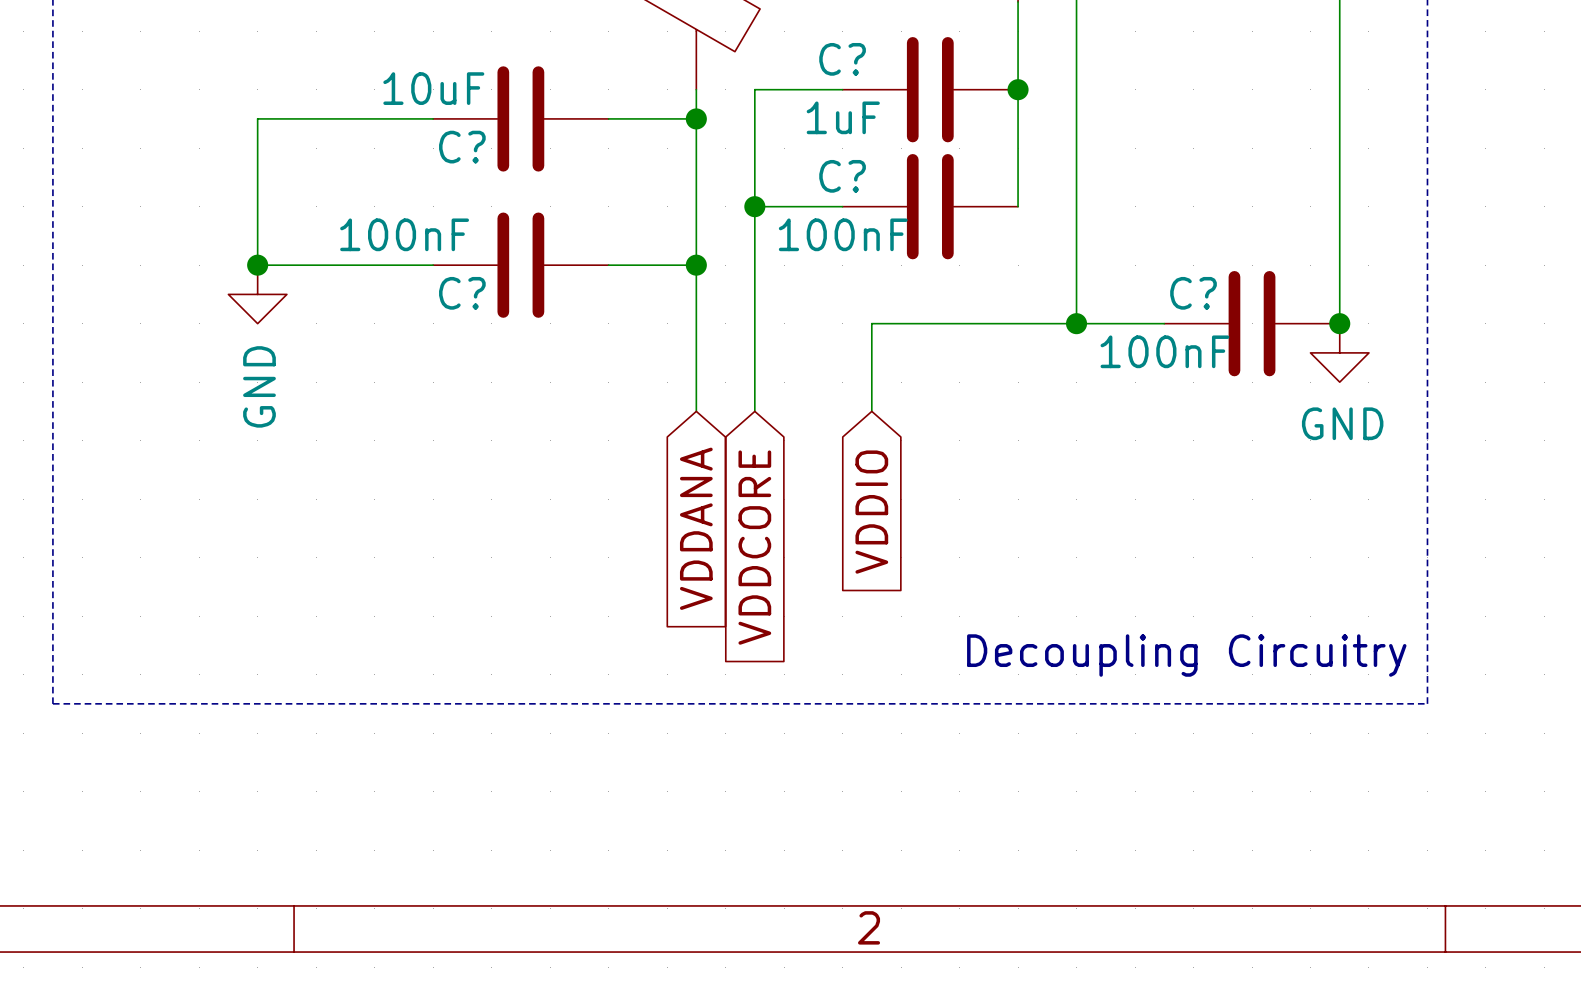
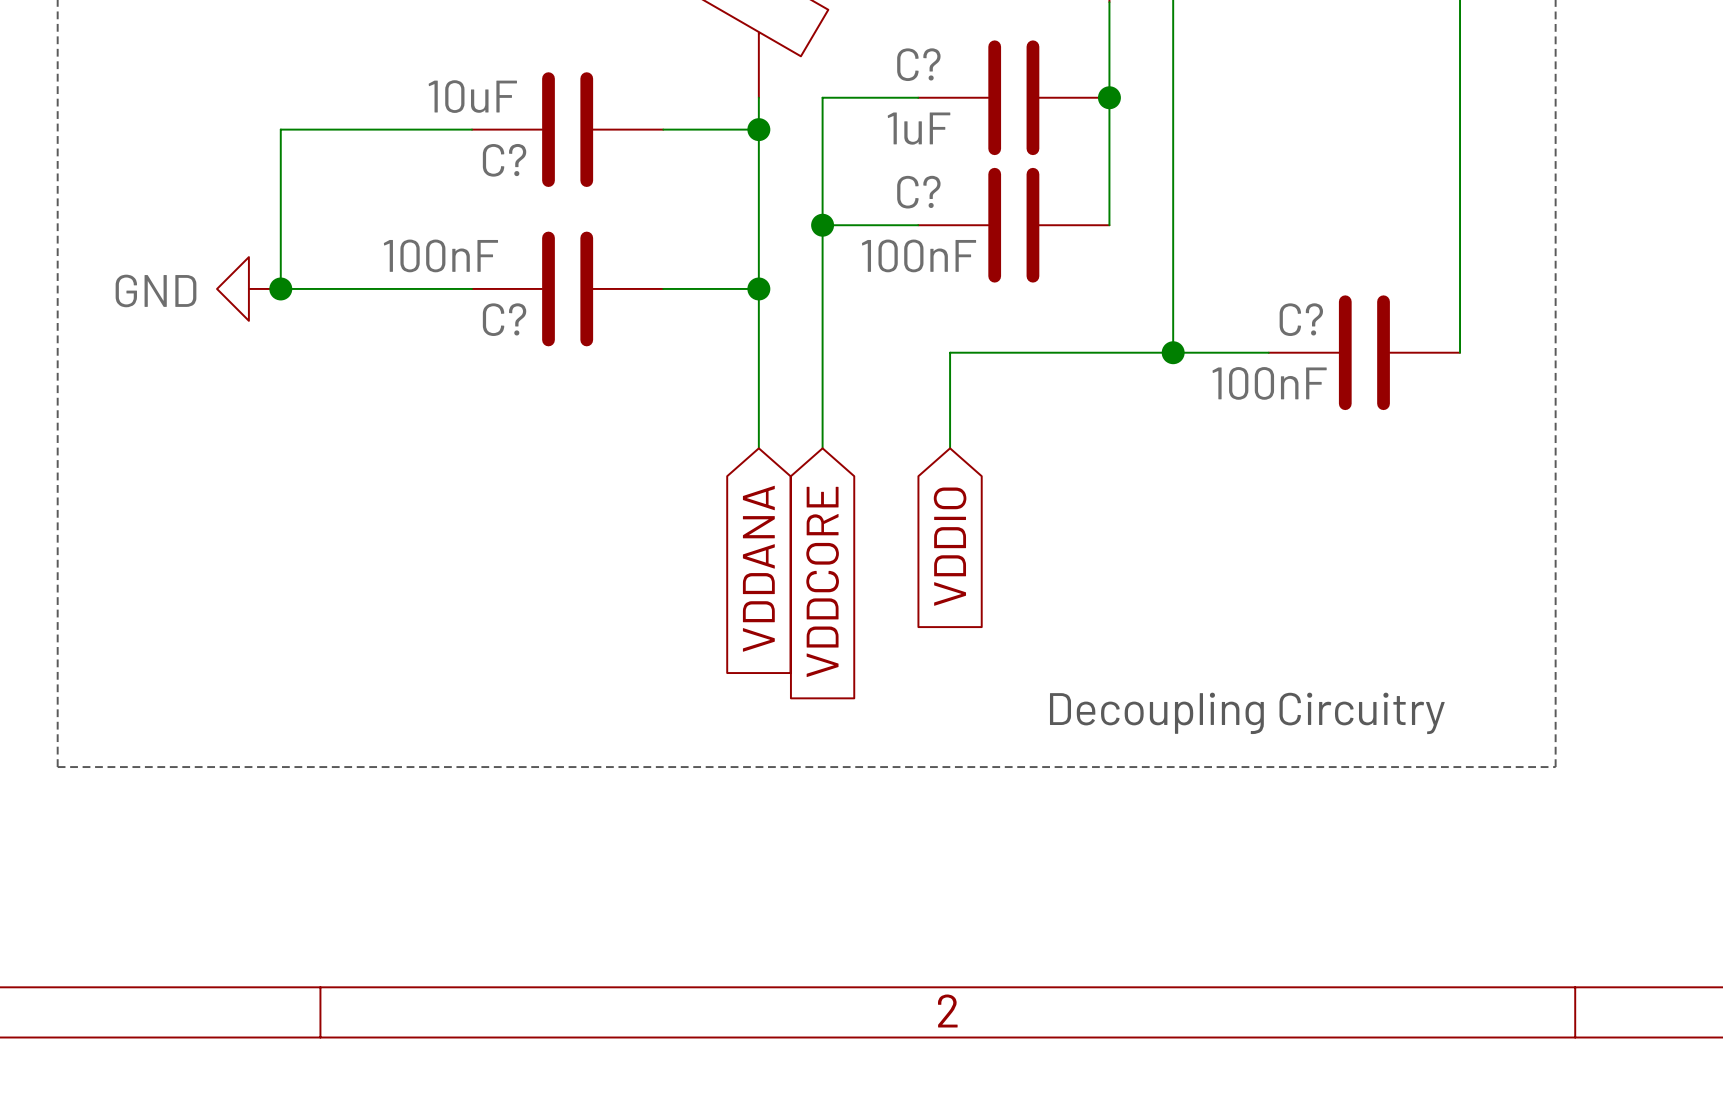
power symbol rotation: 0° (257, 294) -> 90° clockwise (248, 288)
power symbol position: GND (257, 294) -> GND (248, 288)
junction: (1339, 323) -> none
power symbol: GND (1339, 352) -> none

